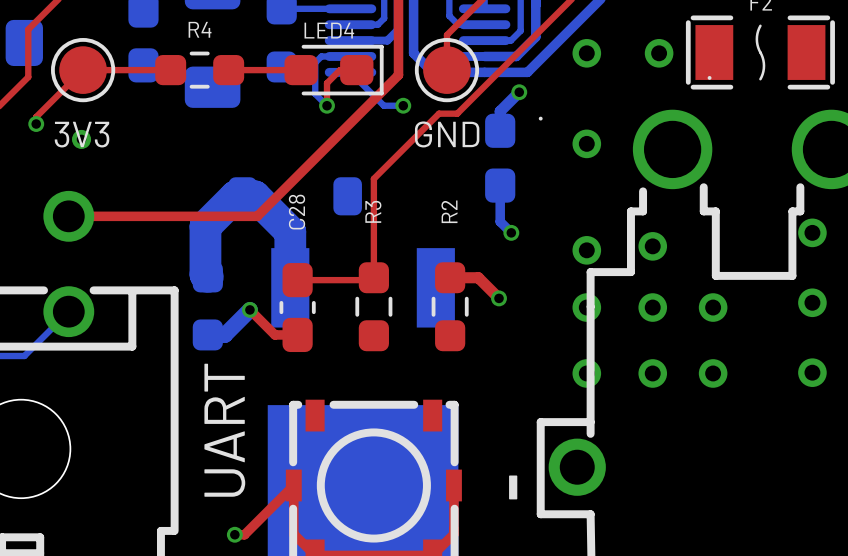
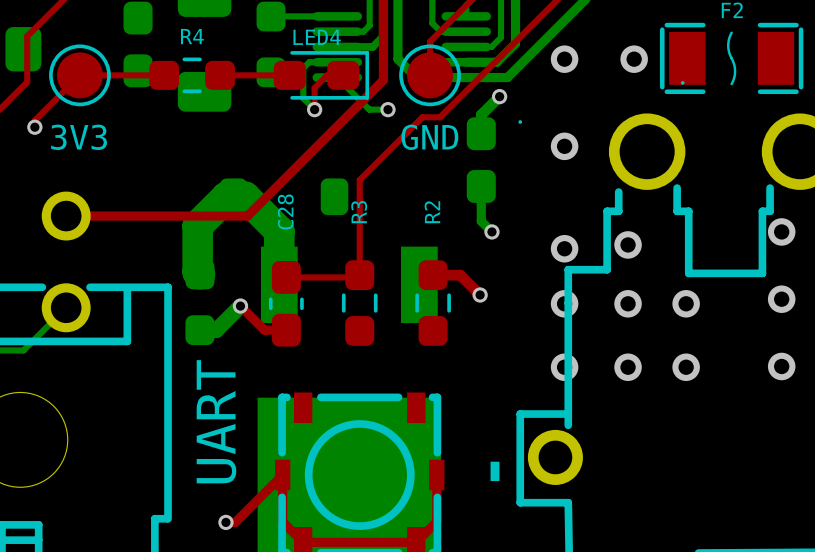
via: (81, 139) -> none

